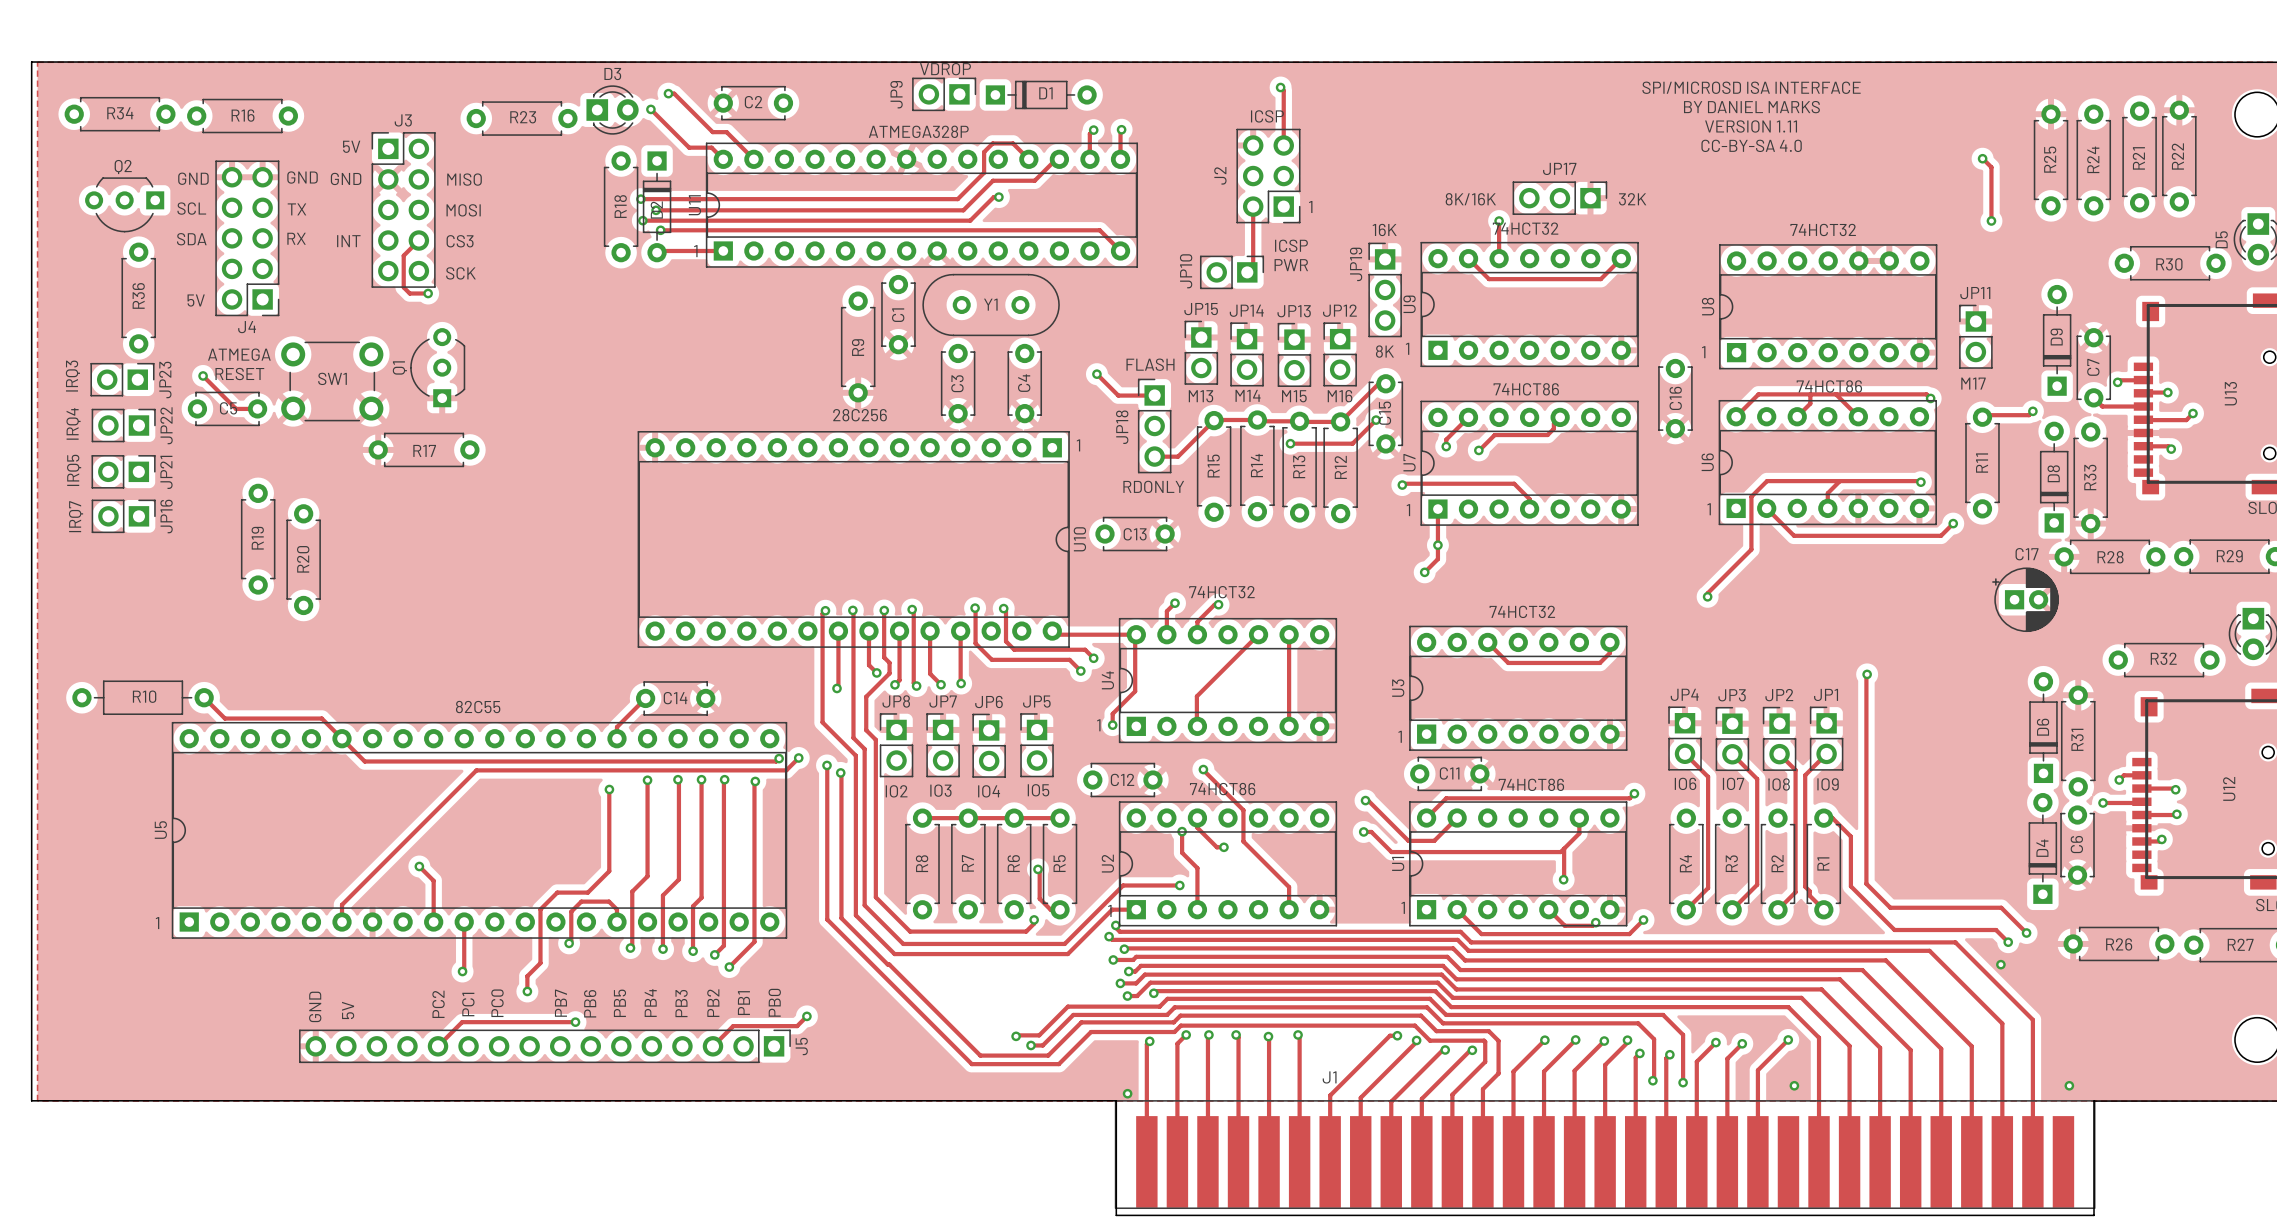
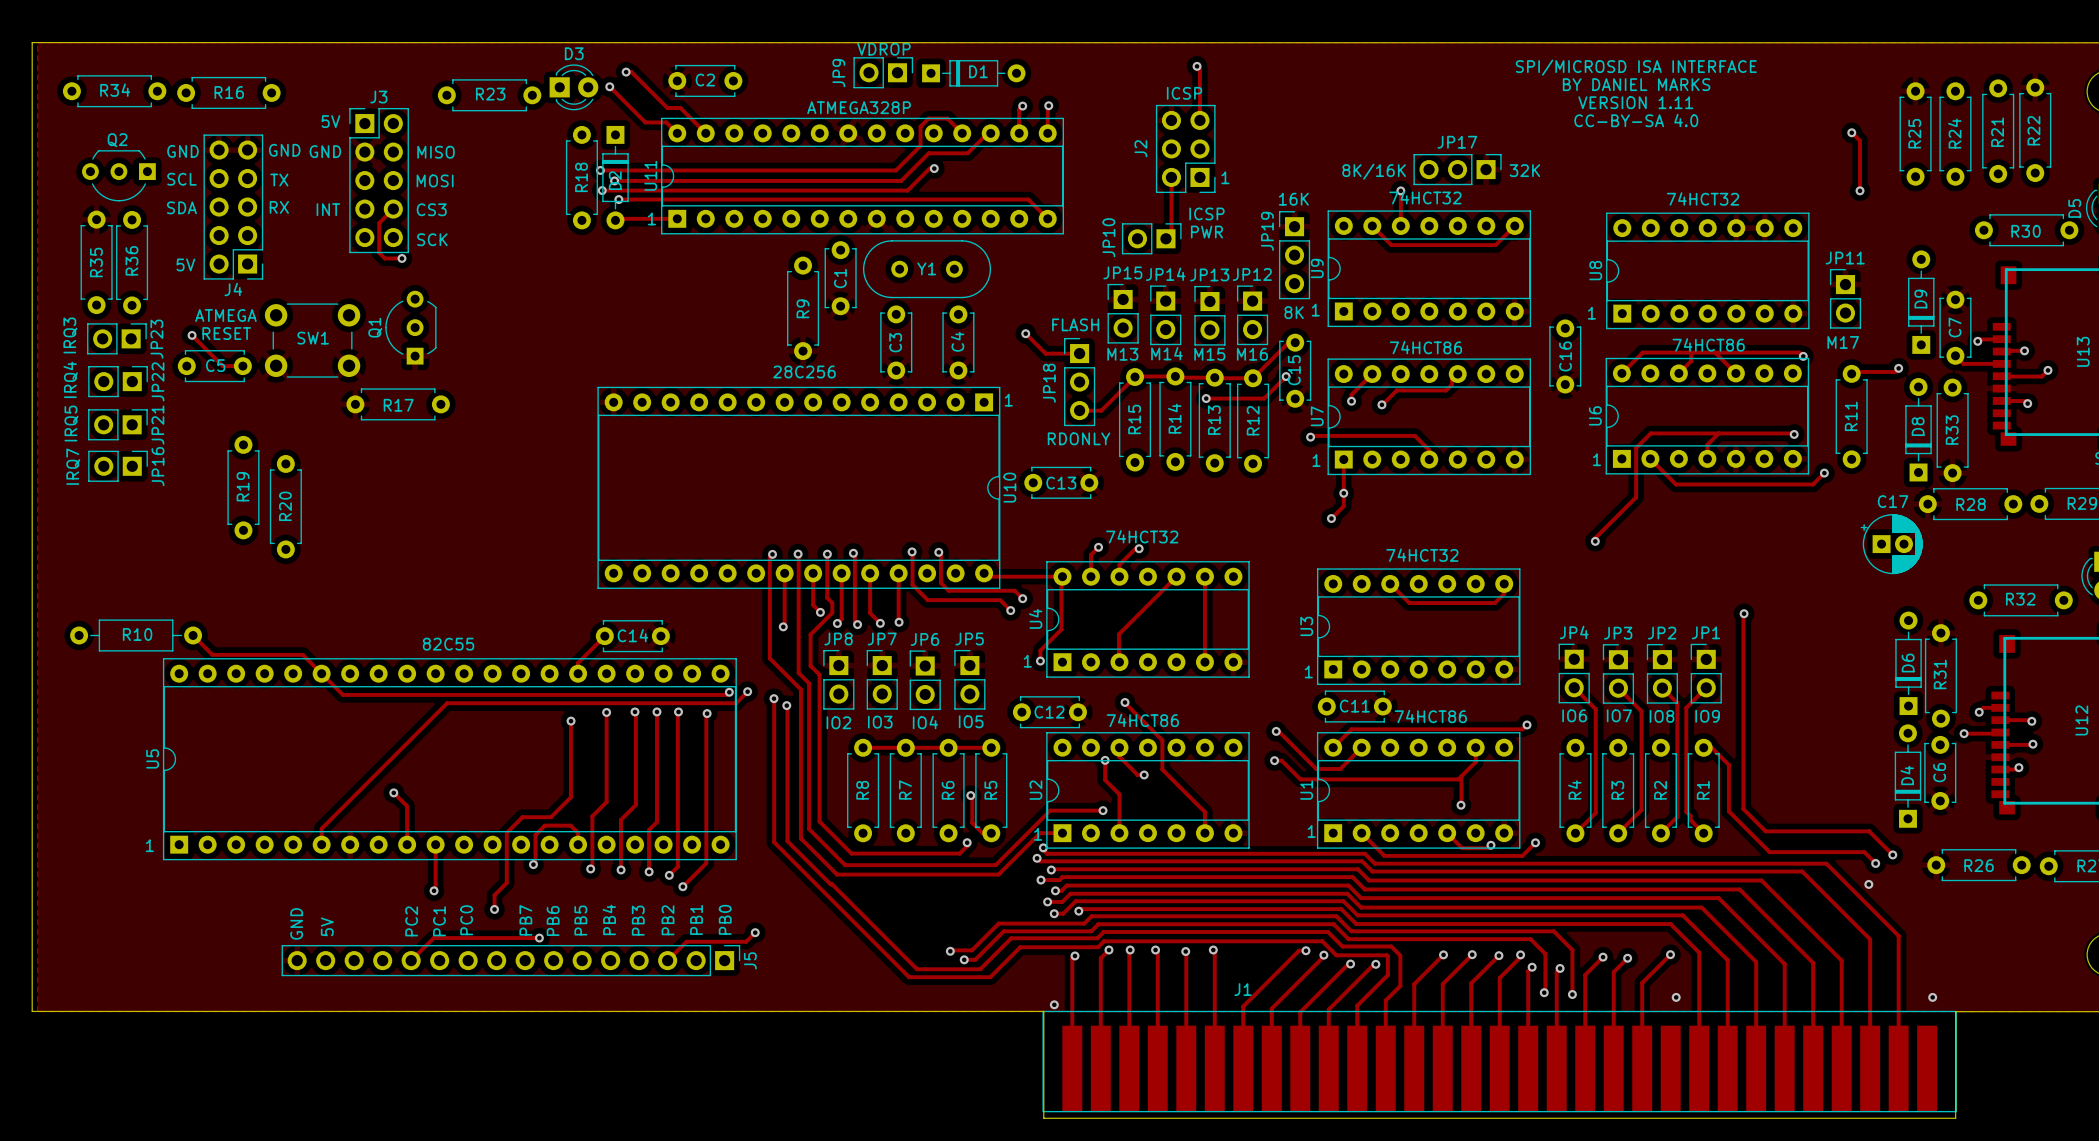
R35: none -> (96, 262)

